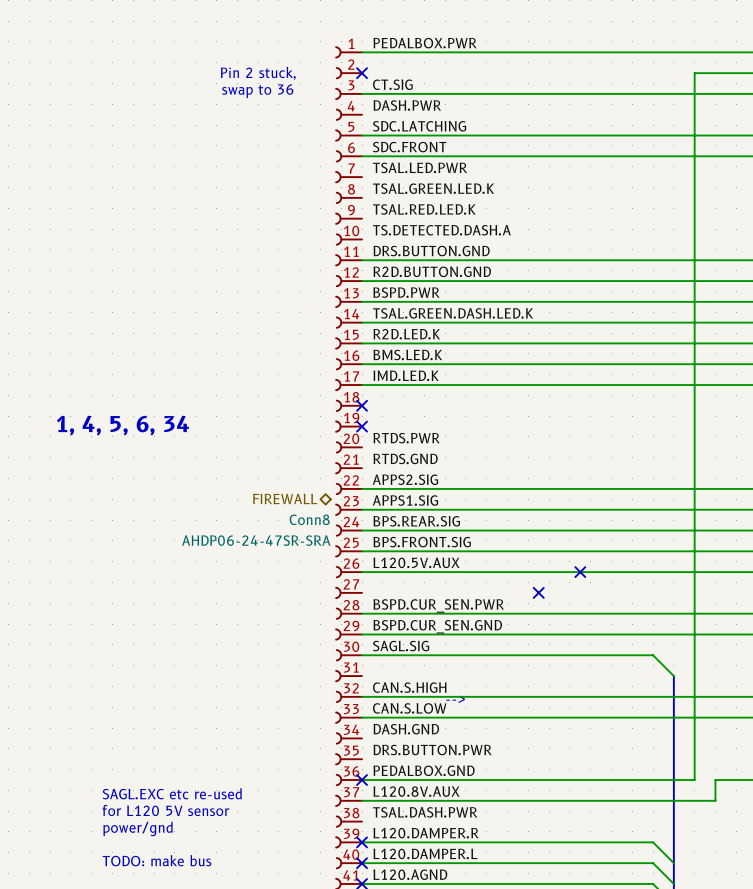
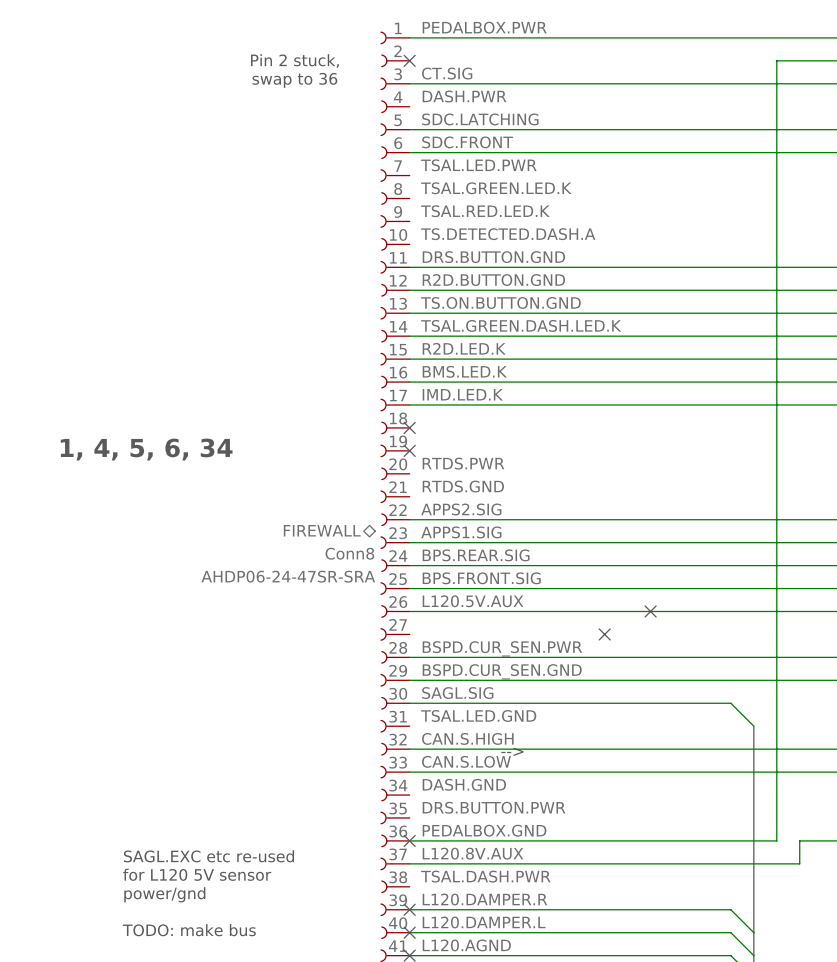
label: BSPD.PWR (406, 292) -> TS.ON.BUTTON.GND (500, 302)
label: none -> TSAL.LED.GND (478, 715)

